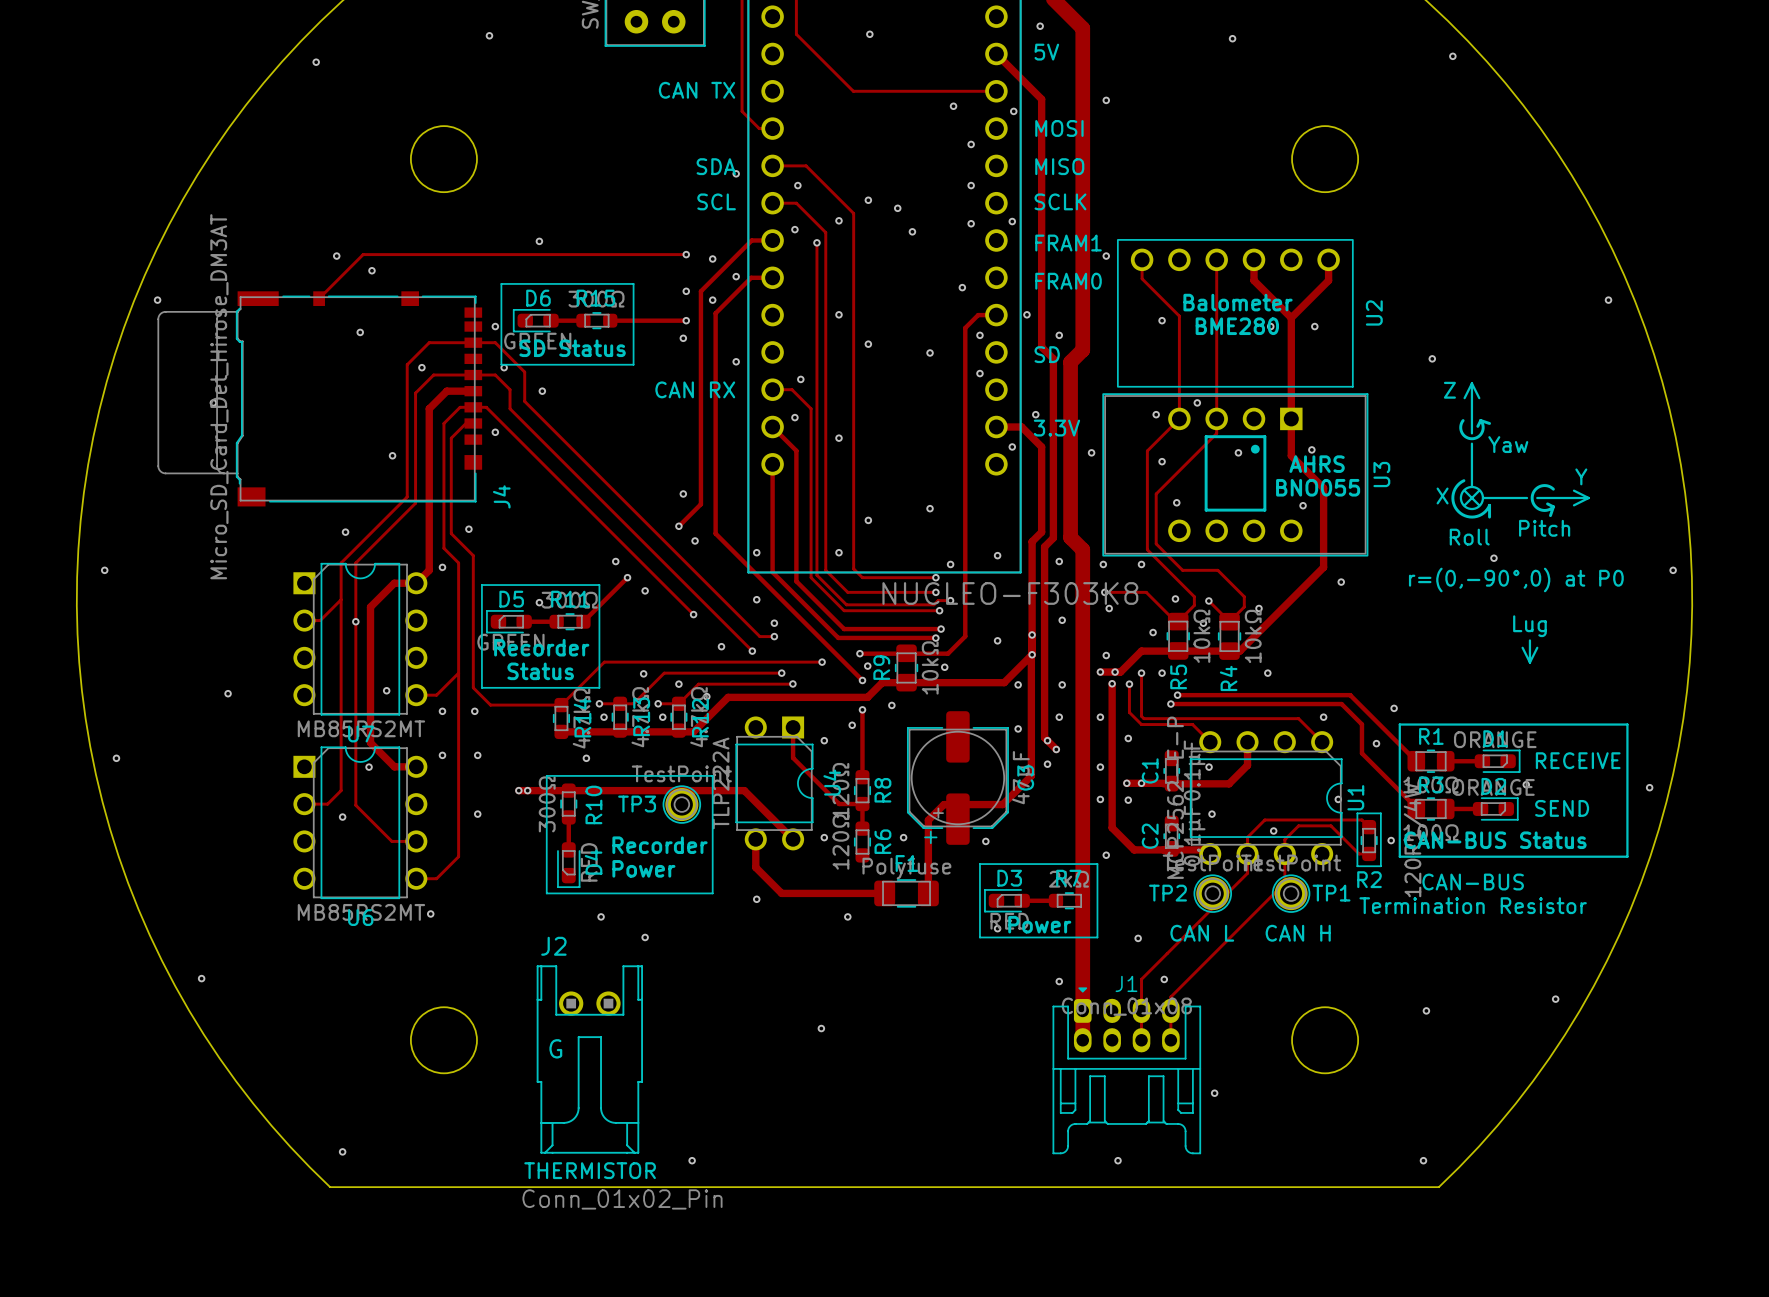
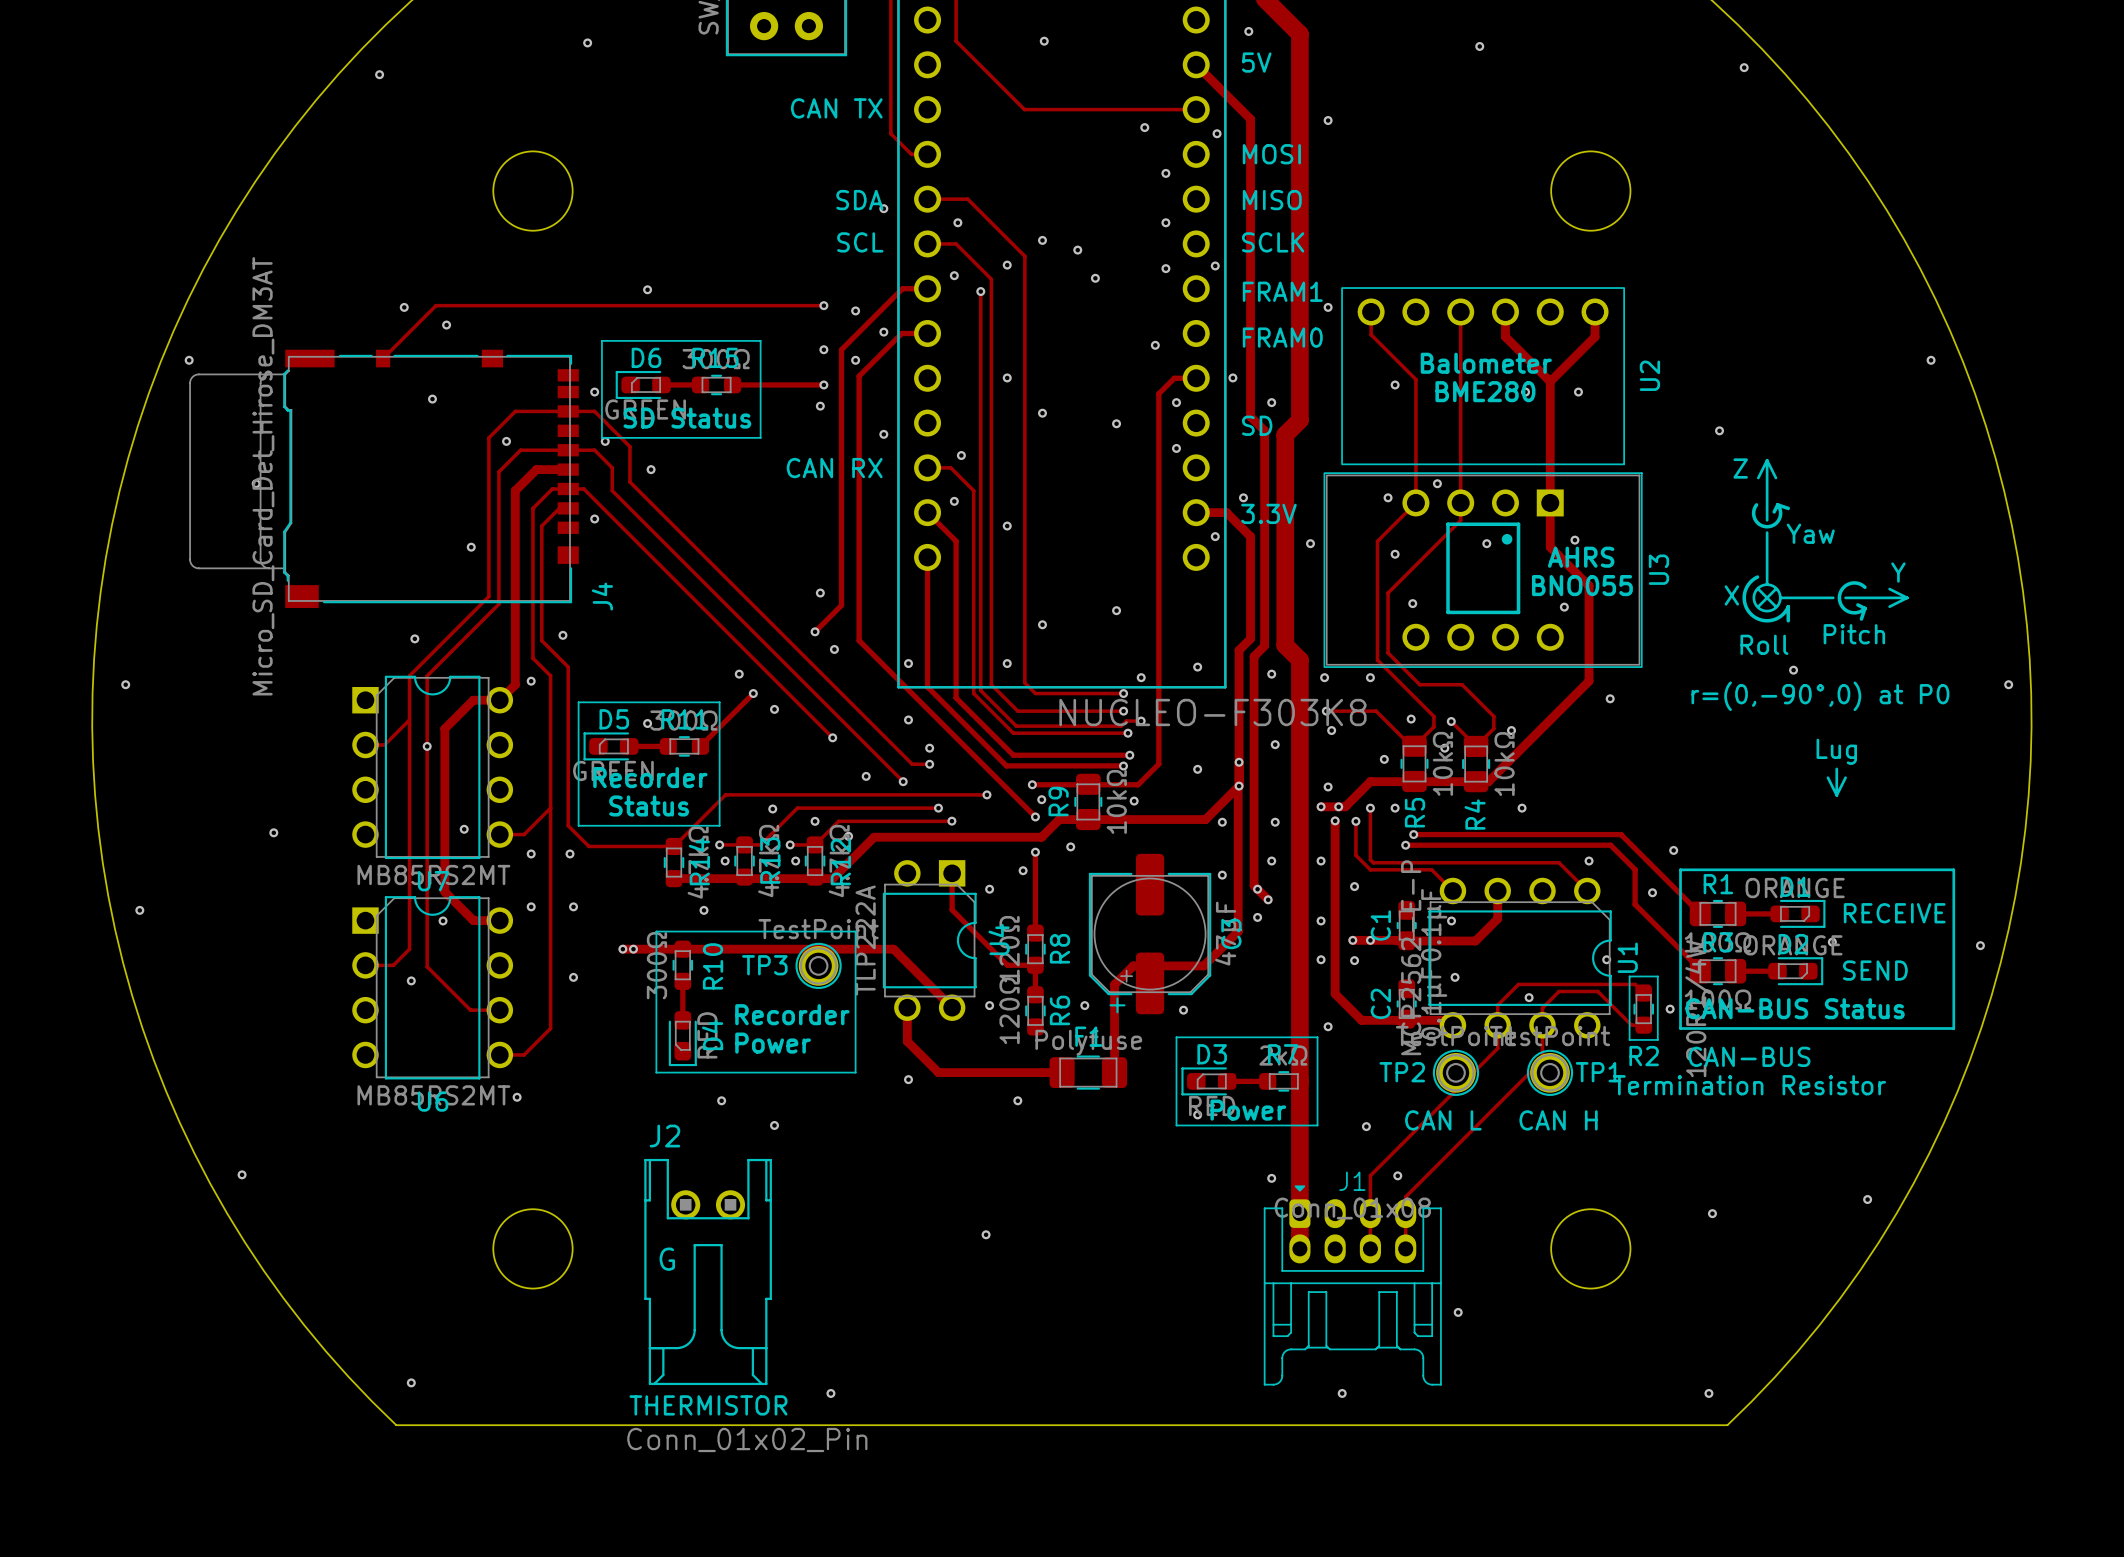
text position: CAN-BUS (1473, 882) -> CAN-BUS (1749, 1056)
text position: Termination Resistor (1473, 905) -> Termination Resistor (1749, 1085)

